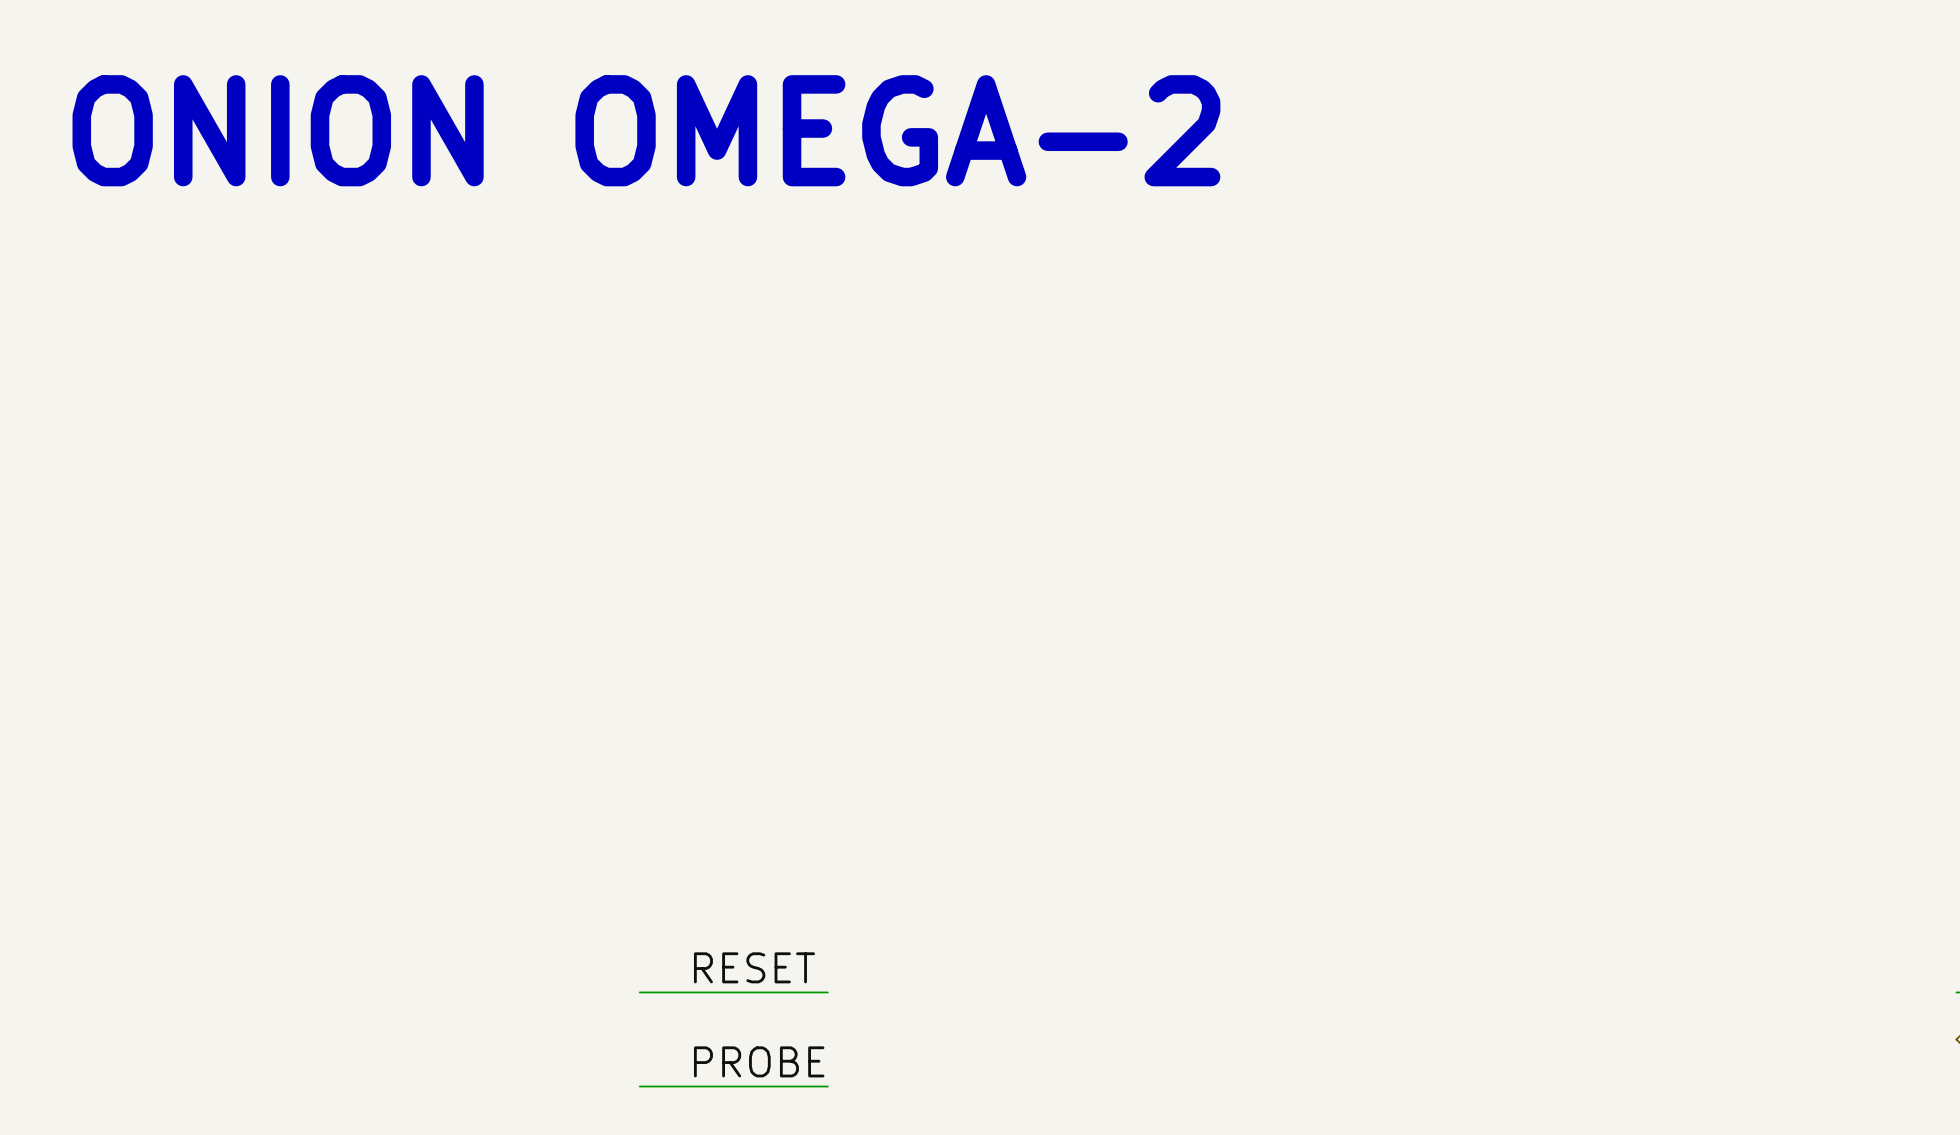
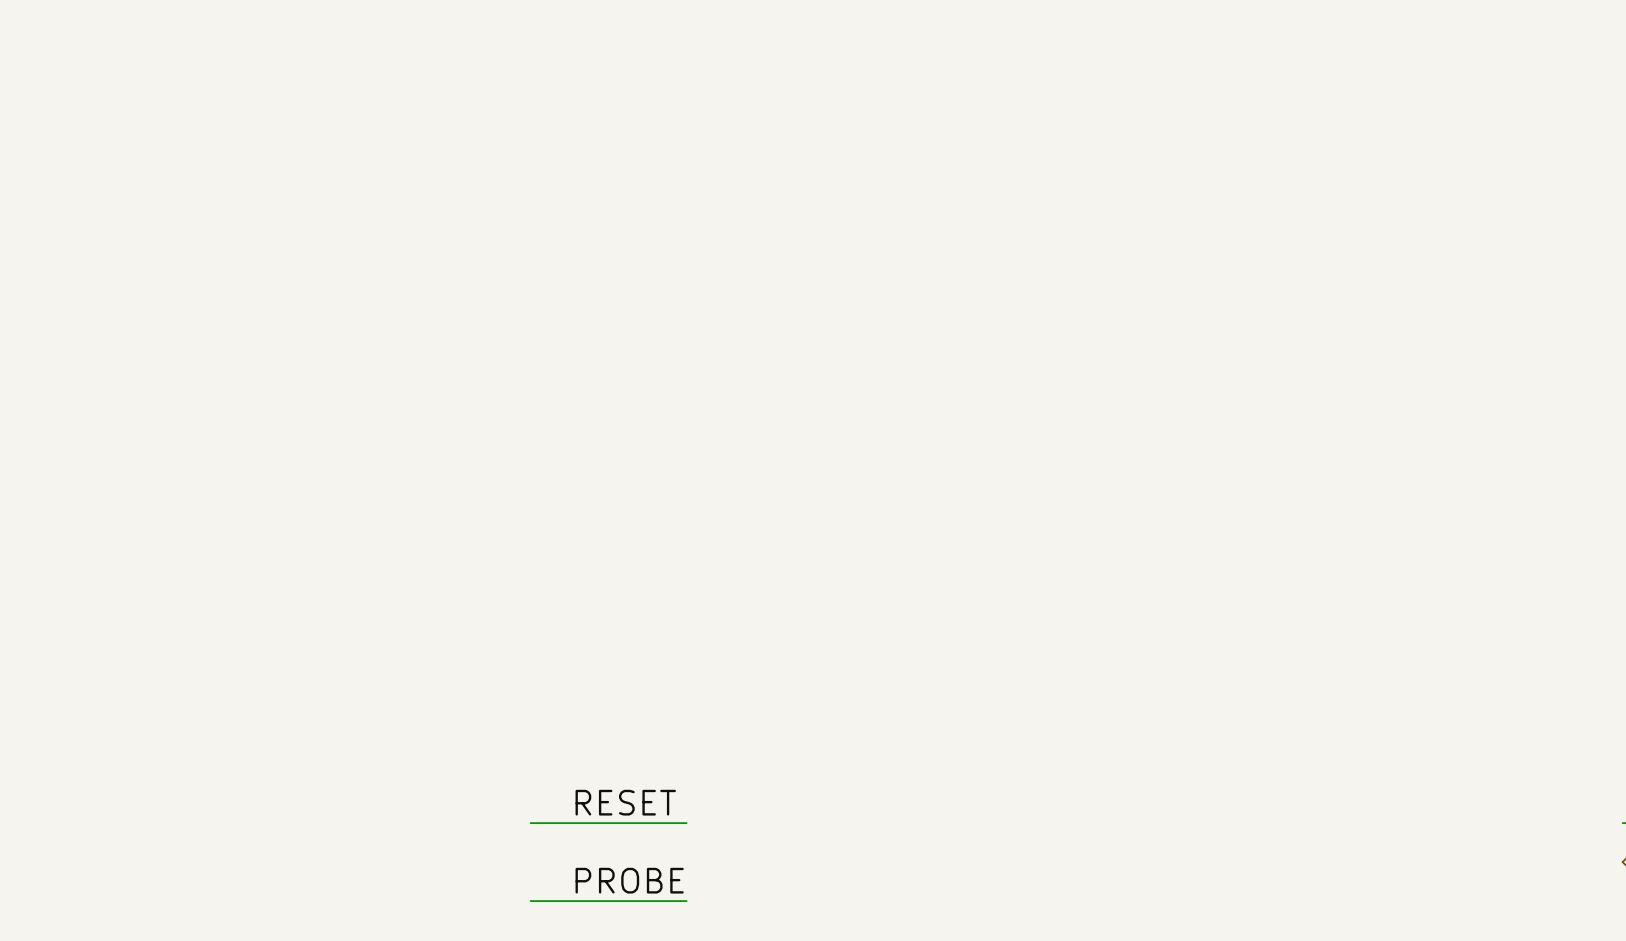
text: ONION OMEGA-2 (646, 130) -> none

